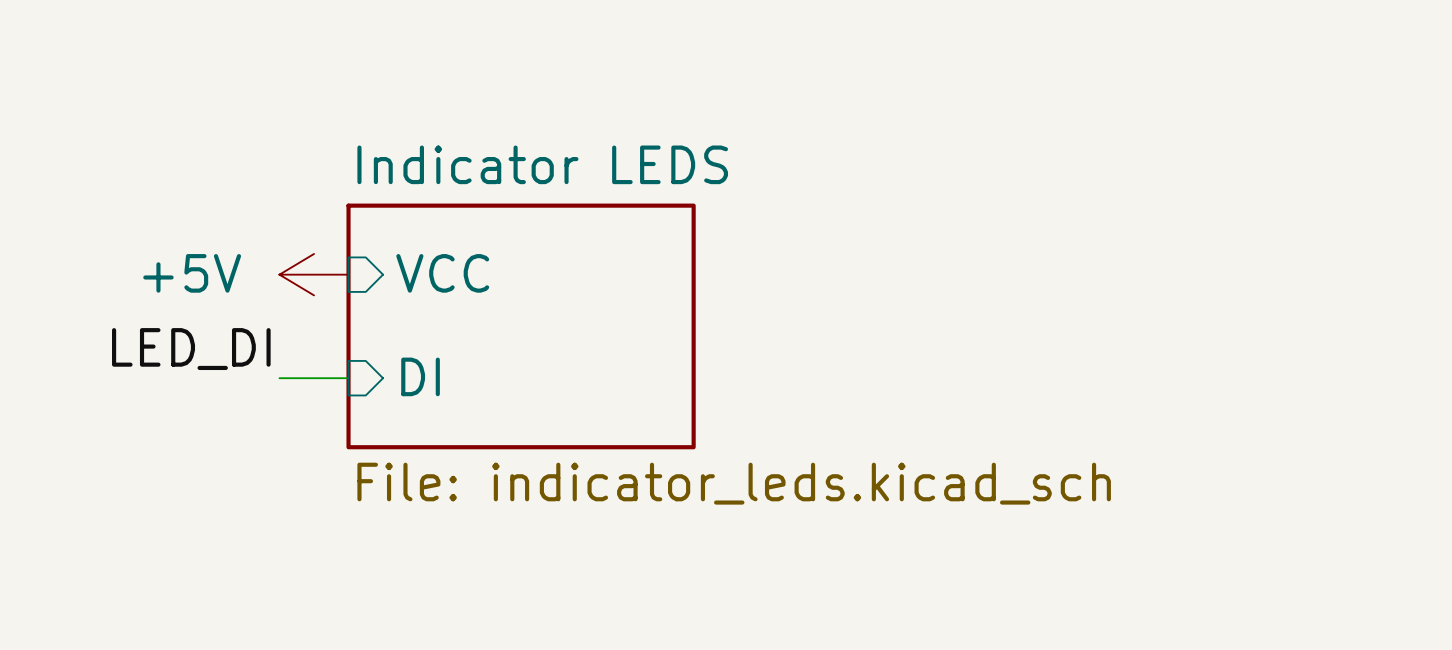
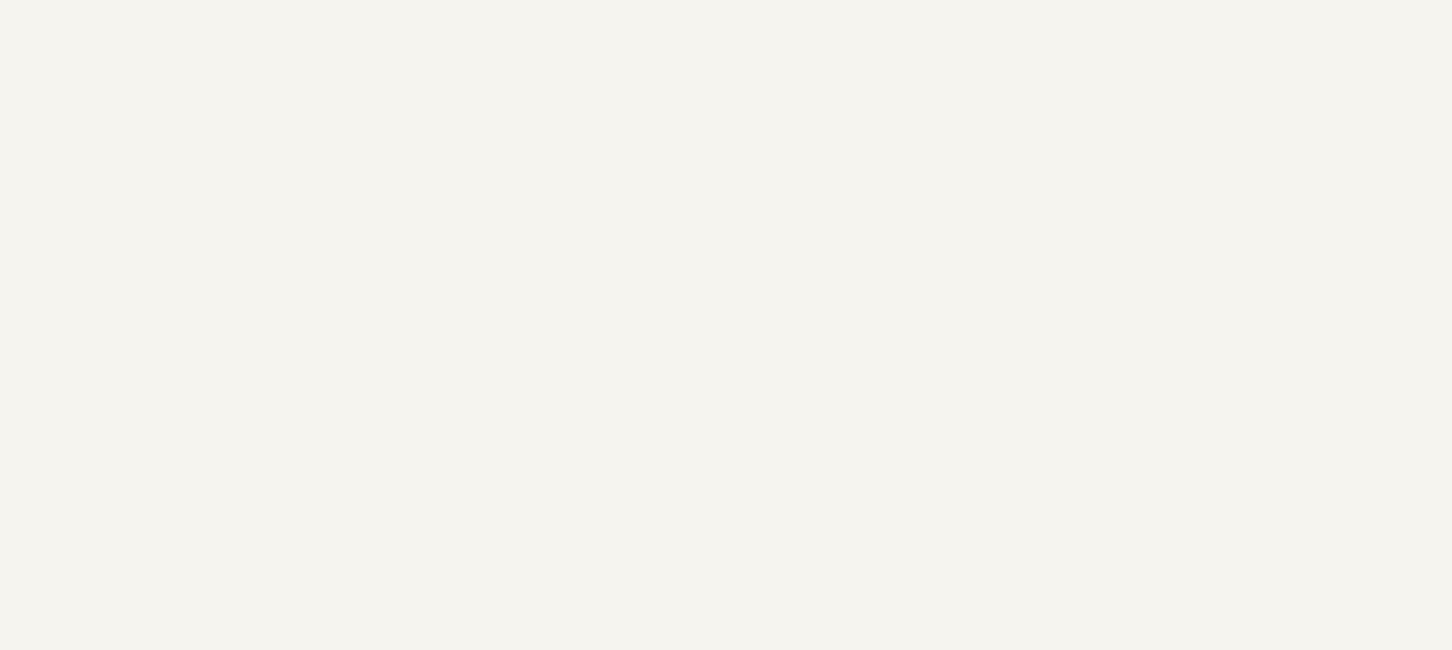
sheet pin: VCC (442, 273) -> none
power symbol: +5V (314, 274) -> none
sheet Indicator LEDS: File: indicator_leds.kicad_sch (521, 326) -> none
label: LED_DI (191, 349) -> none
sheet pin: DI (420, 376) -> none
wire: (279, 378) (348, 378) -> none

